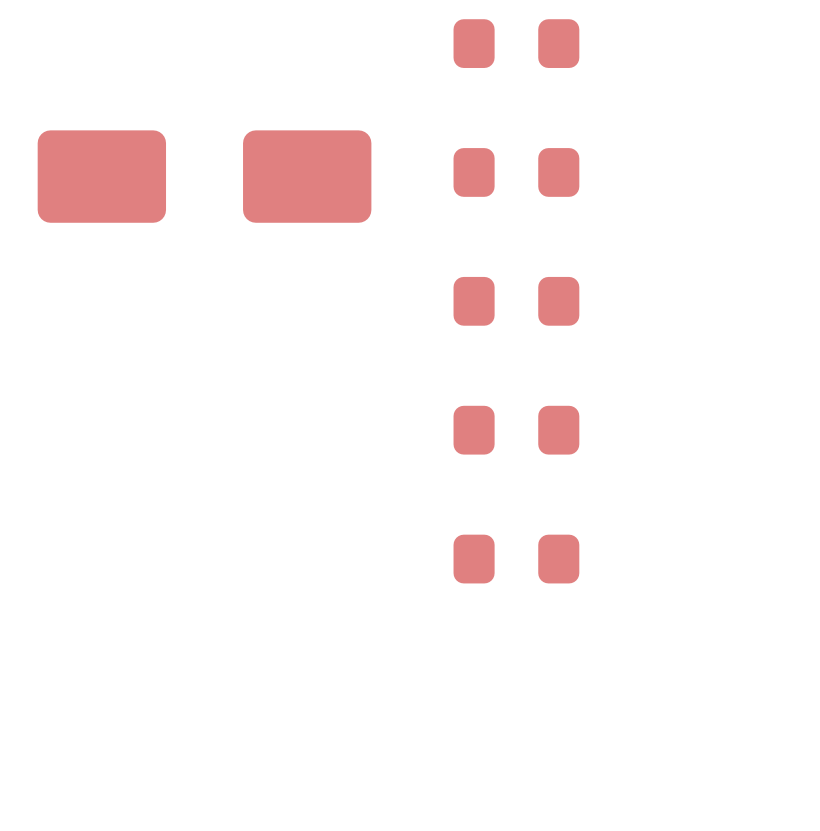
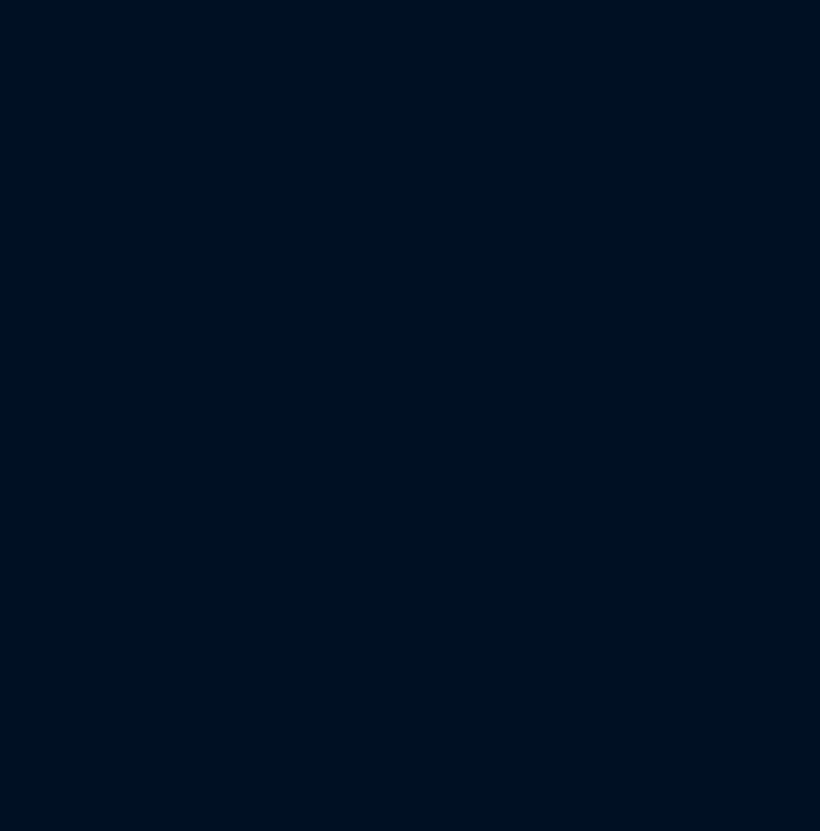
part: (516, 43) -> none
part: (516, 172) -> none
part: (204, 176) -> none
part: (516, 301) -> none
part: (516, 430) -> none
part: (516, 559) -> none

